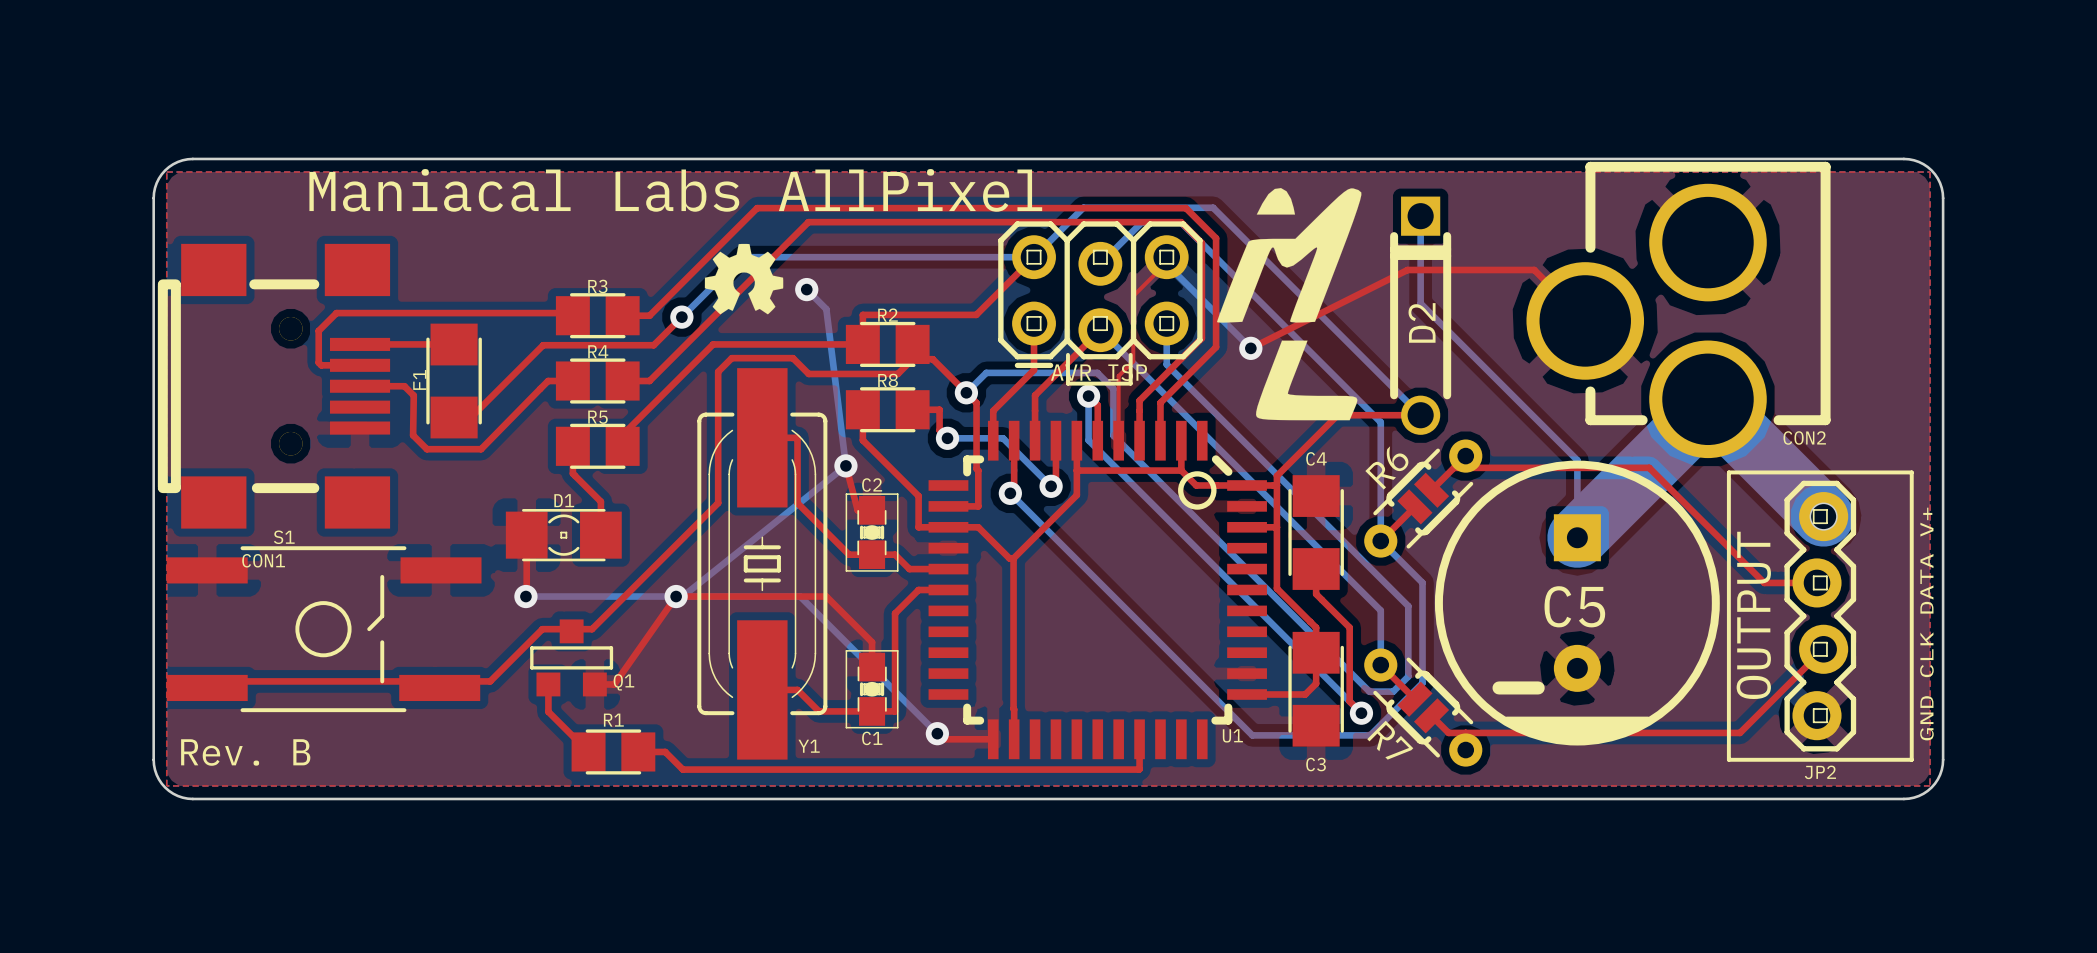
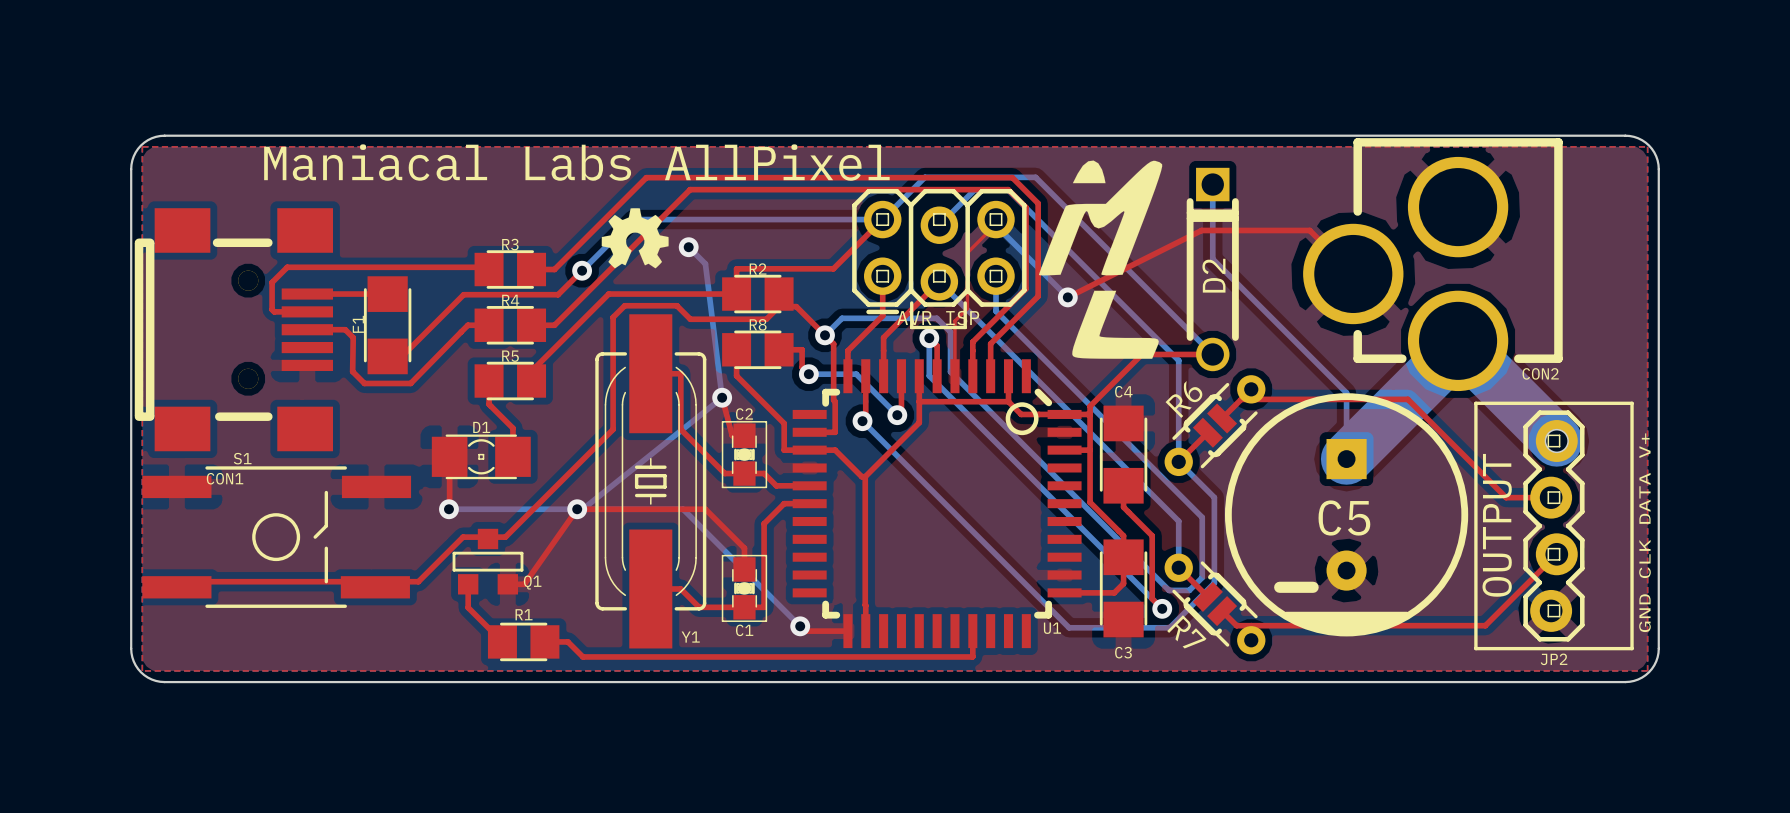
text: Rev. B (245, 752) -> none

